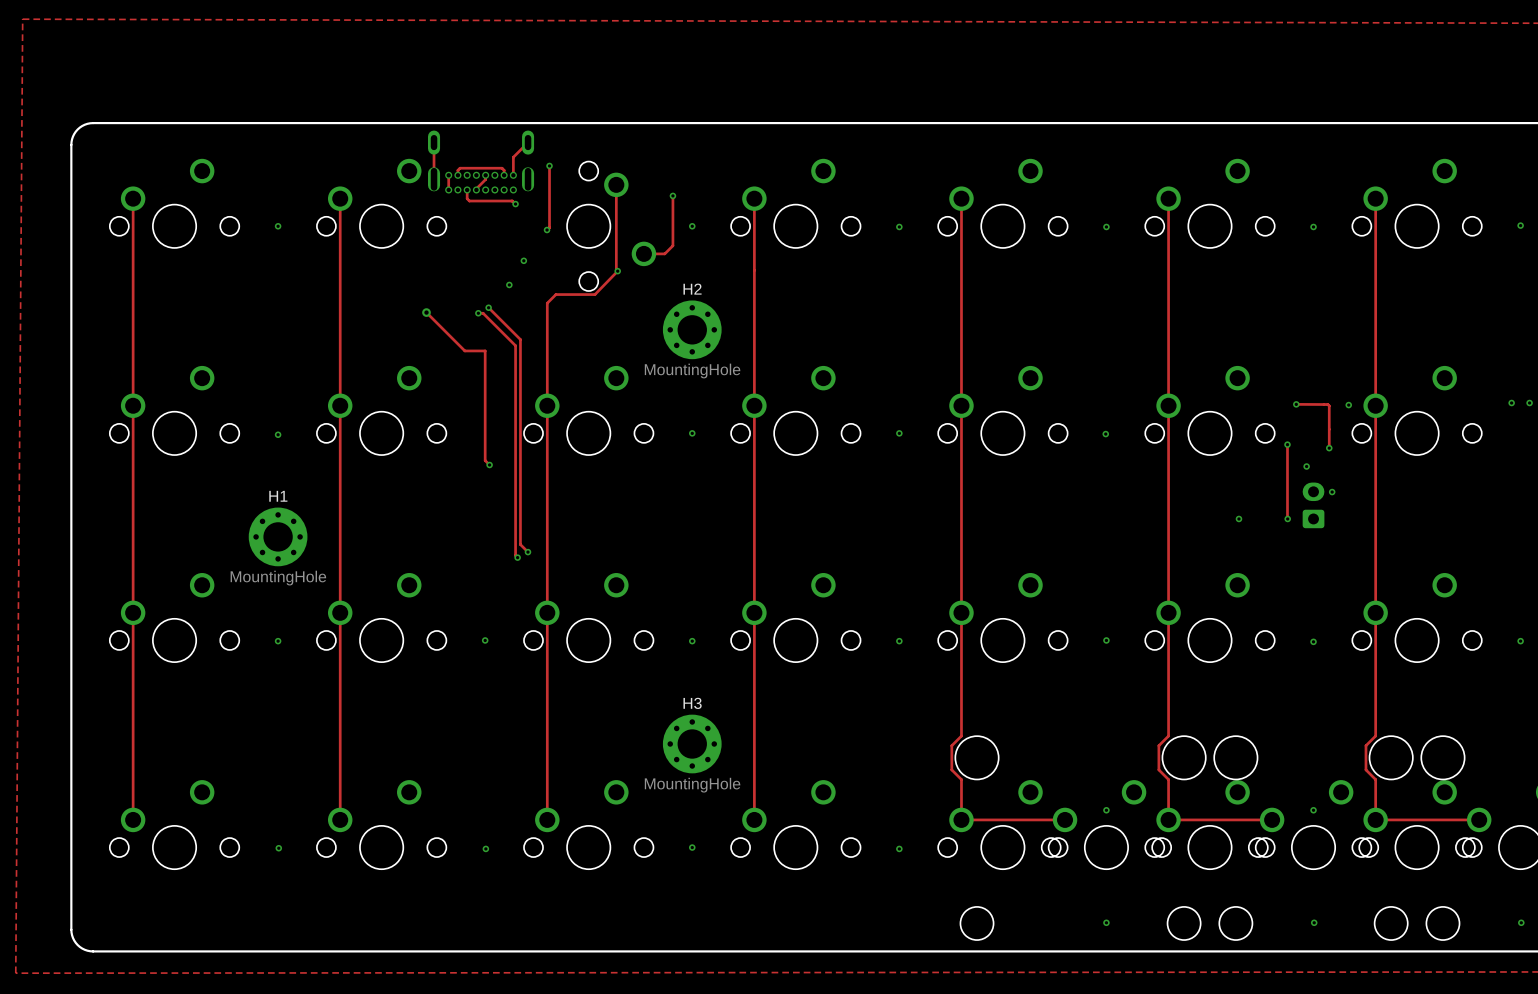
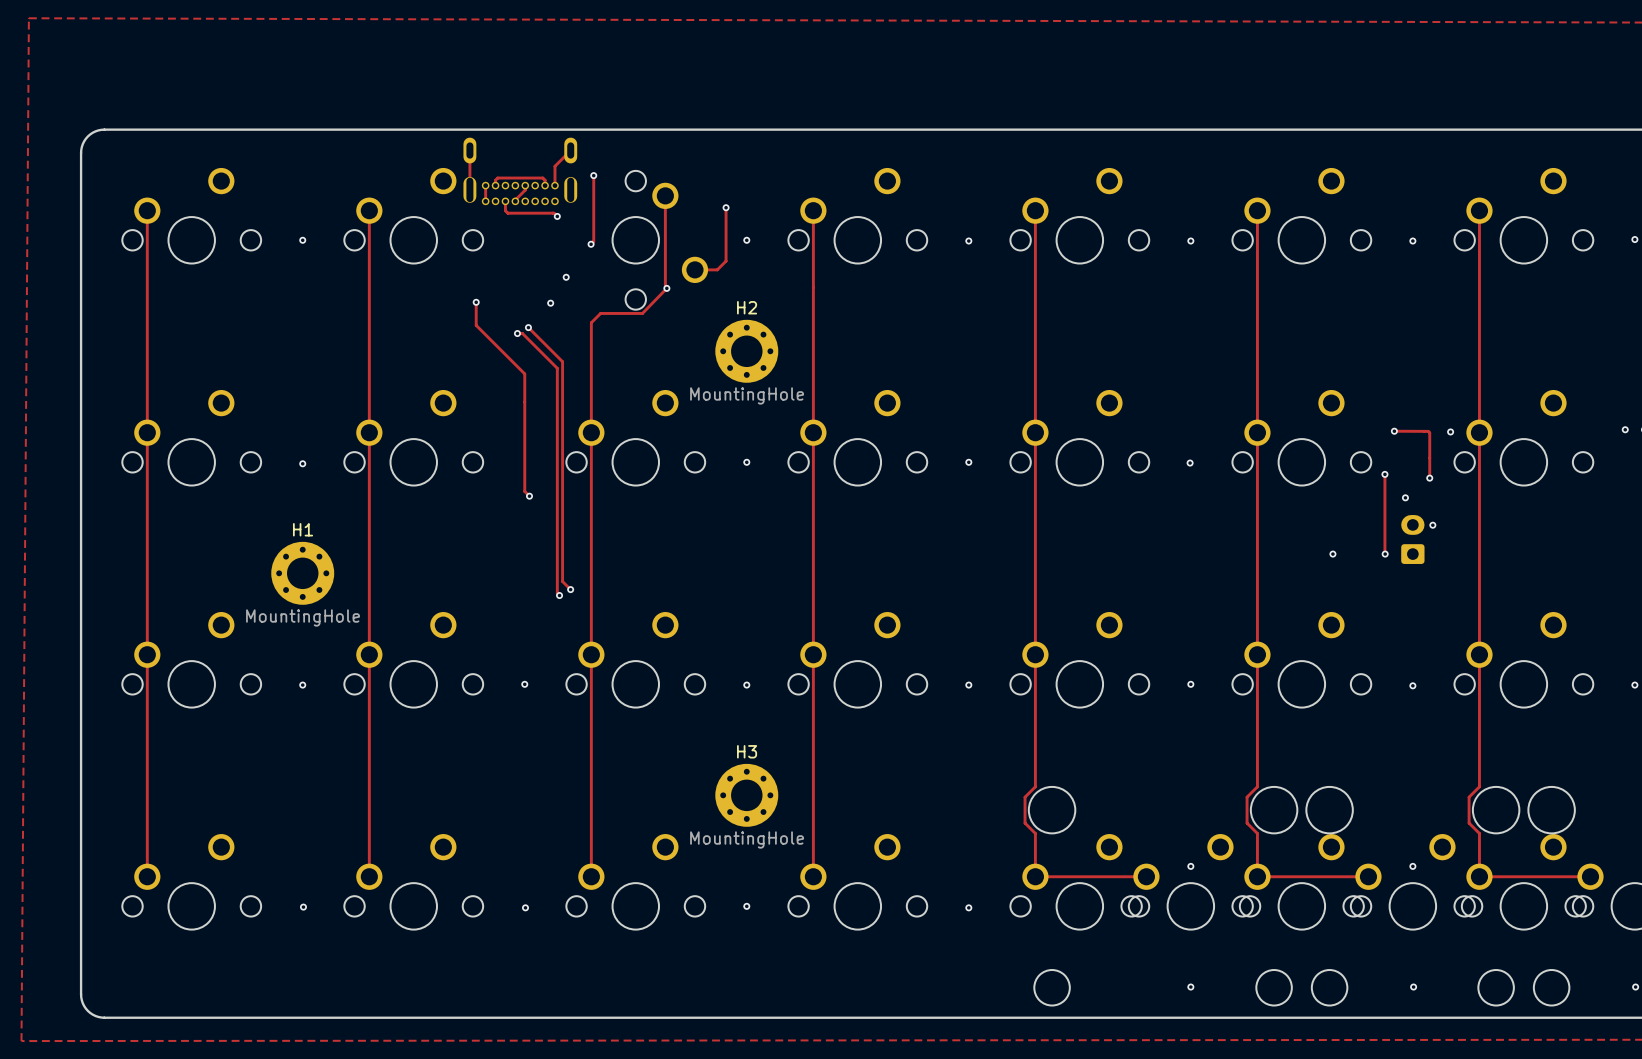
via: none -> (476, 302)
track: (426, 312) (464, 350) (485, 350) -> (476, 302) (476, 325) (524, 373)
via: (426, 312) -> none

